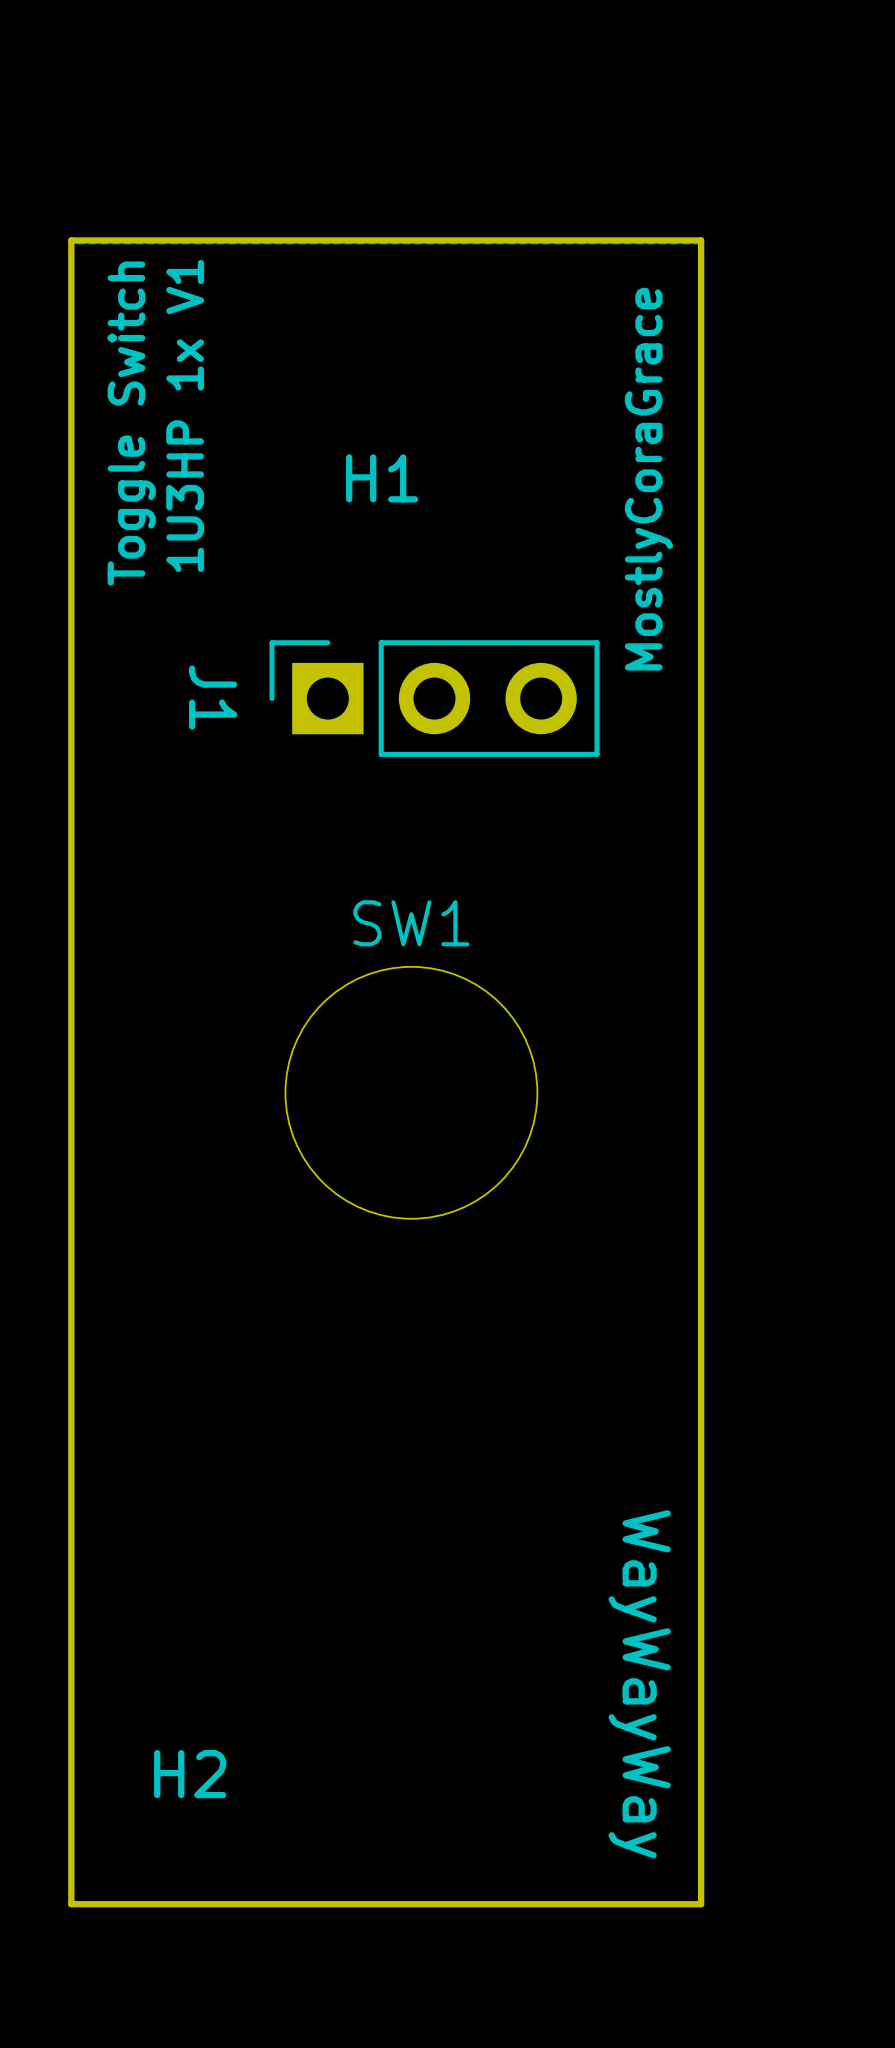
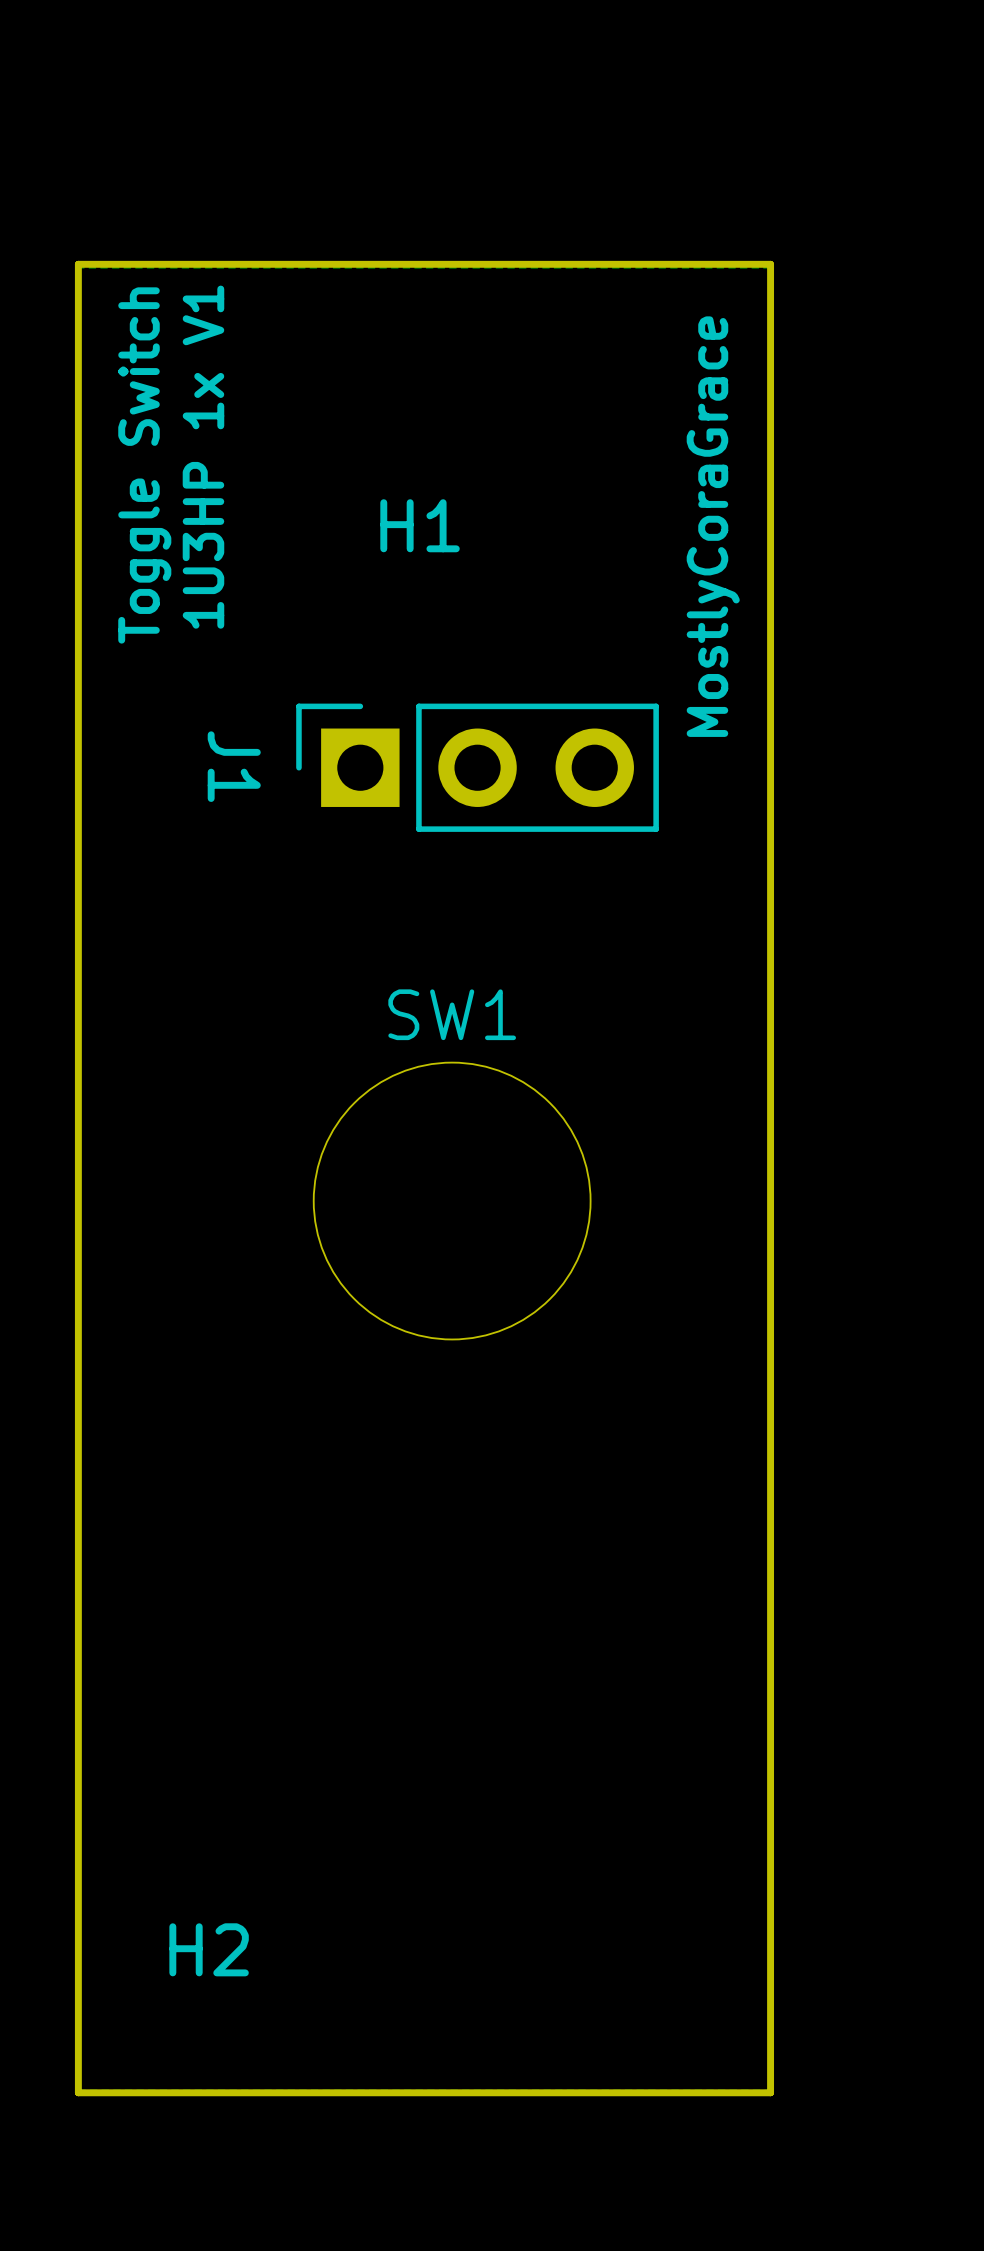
text: WayWayWay (639, 1684) -> none

